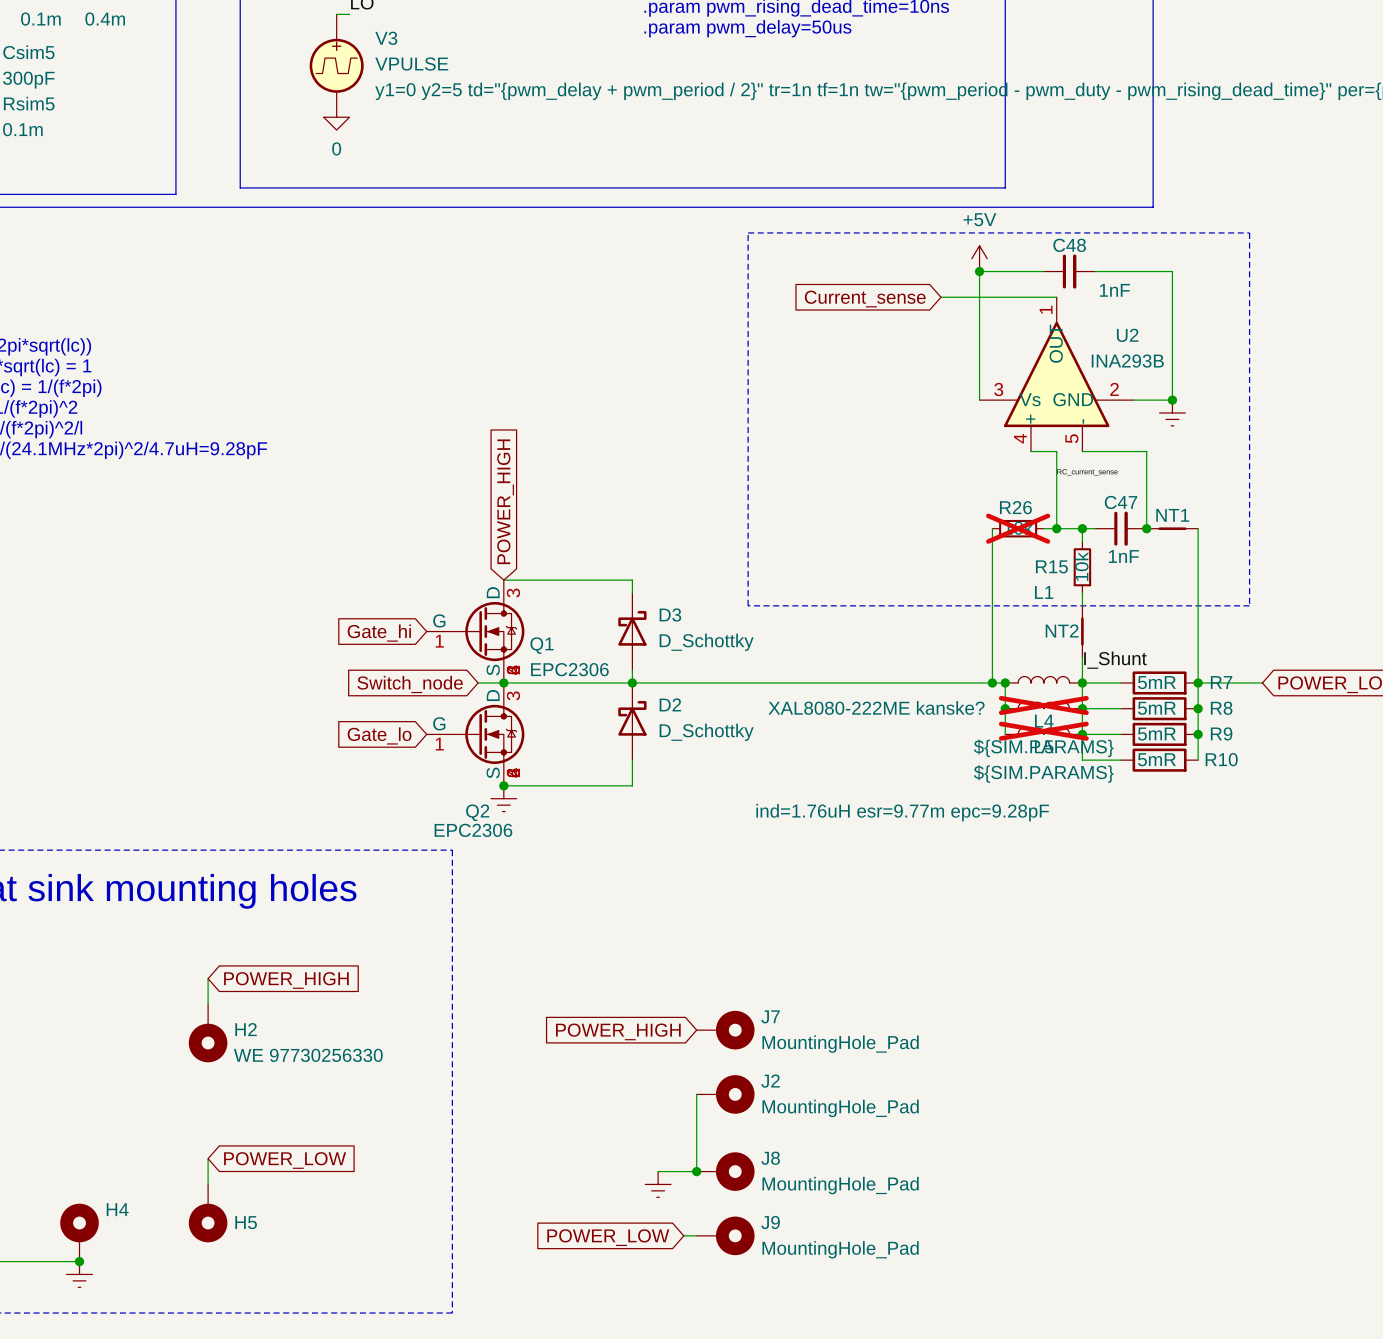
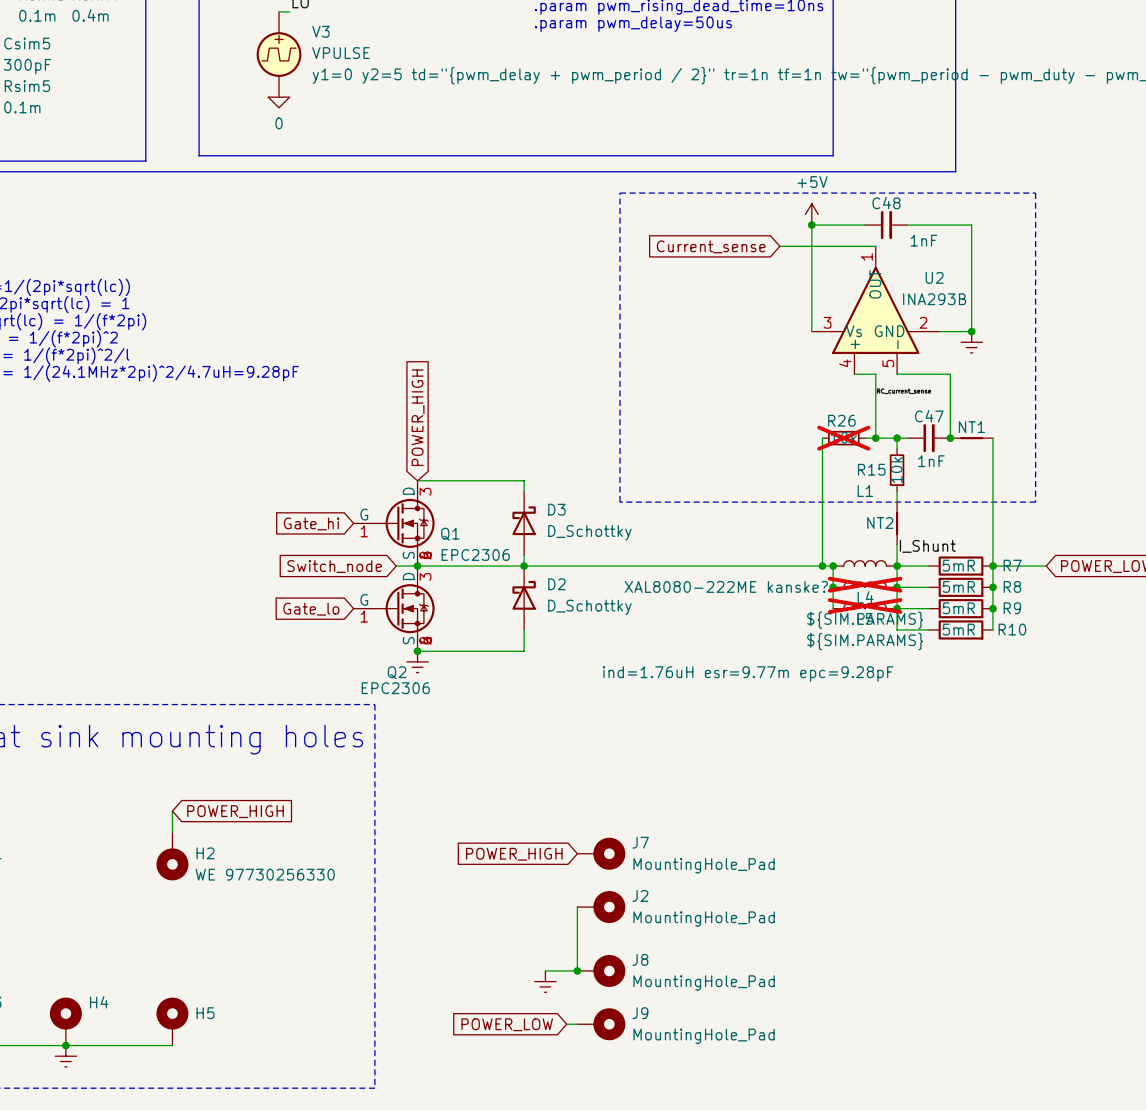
wire: (208, 1158) (208, 1184) -> none
global label: POWER_LOW (285, 1160) -> none
H5 rotation: 0° (208, 1223) -> 180° (172, 1013)
wire: none -> (65, 1045) (172, 1045)

